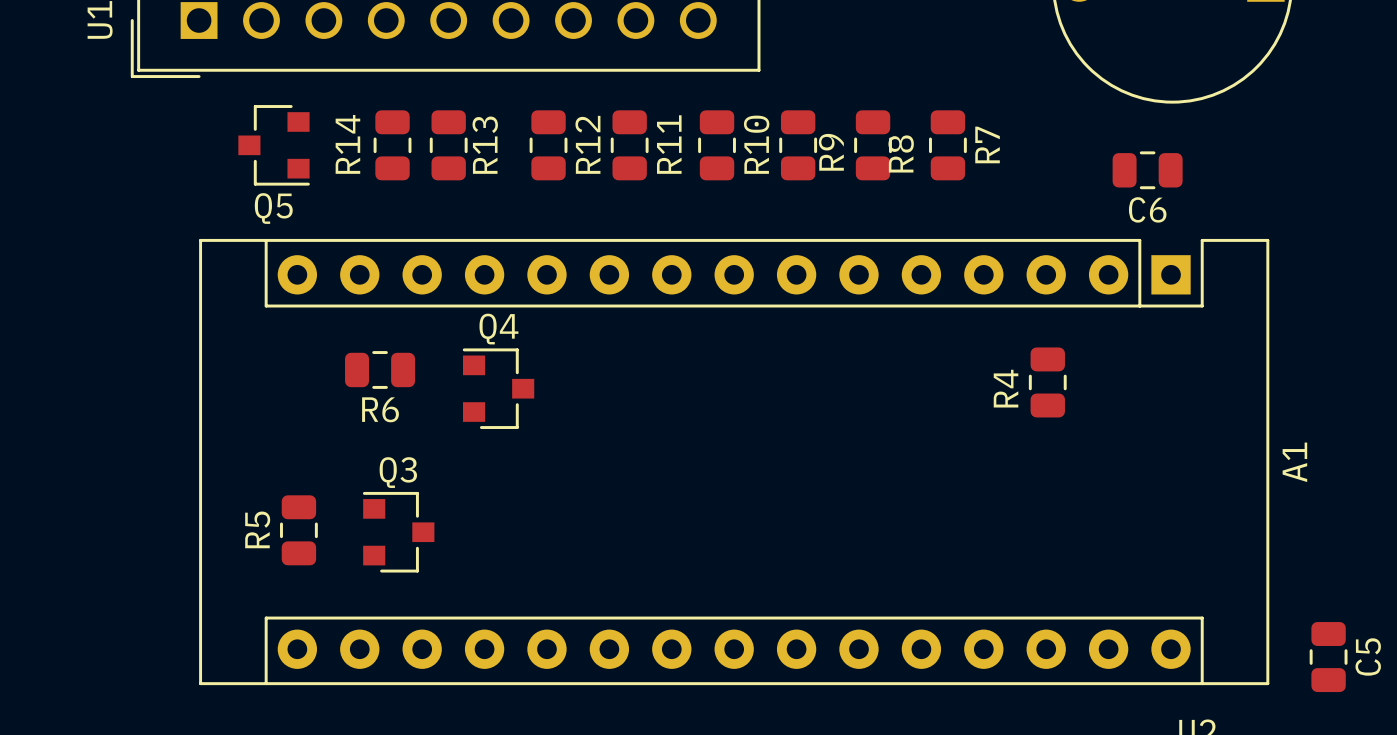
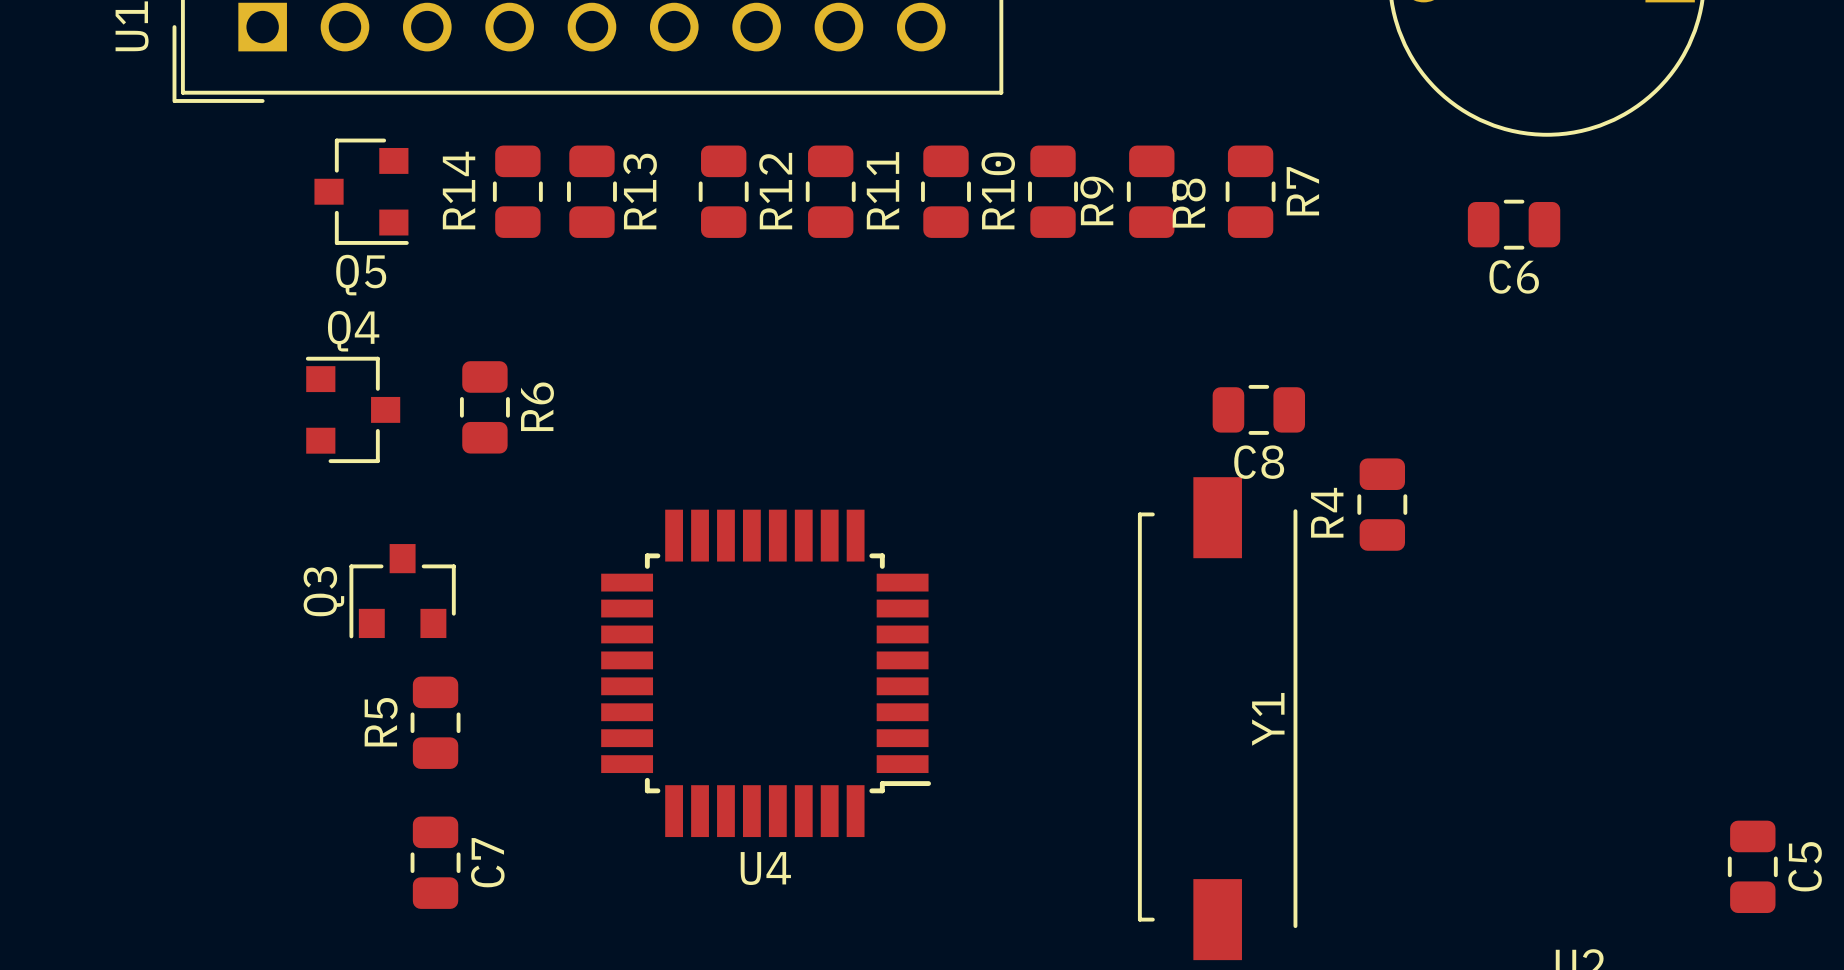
C8: none -> (1258, 409)
R6 rotation: 0° (380, 369) -> 90° clockwise (484, 407)
R6 position: (380, 369) -> (484, 407)
Q4 position: (498, 388) -> (353, 409)
R6 name position: R6 (380, 409) -> R6 (537, 406)
A1: (734, 462) -> none
U4: none -> (766, 673)
R5 position: (298, 530) -> (435, 722)
Q3 rotation: 0° (398, 532) -> 90° counterclockwise (402, 591)
Q3 position: (398, 532) -> (402, 591)
Y1: none -> (1217, 718)
C7: none -> (435, 862)

